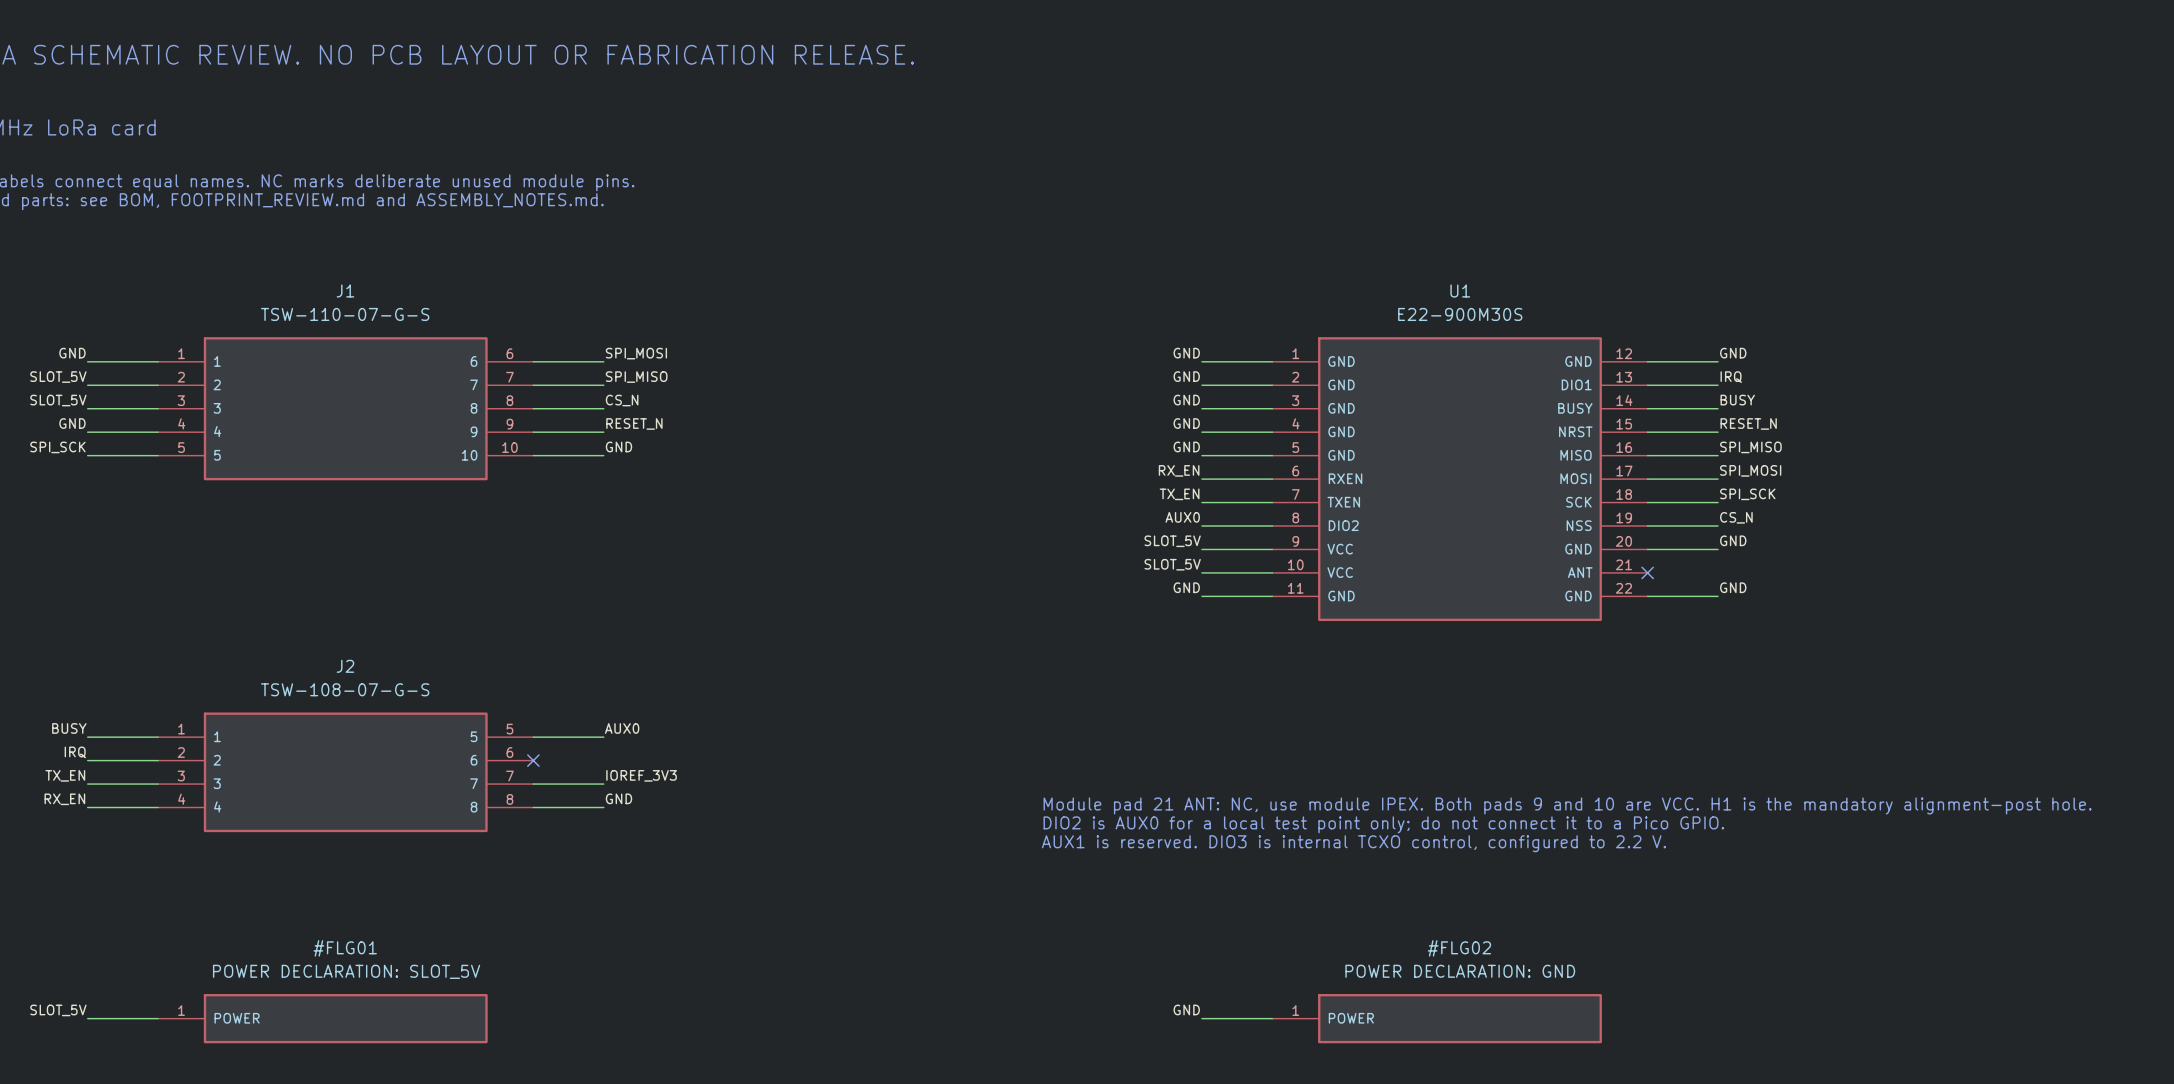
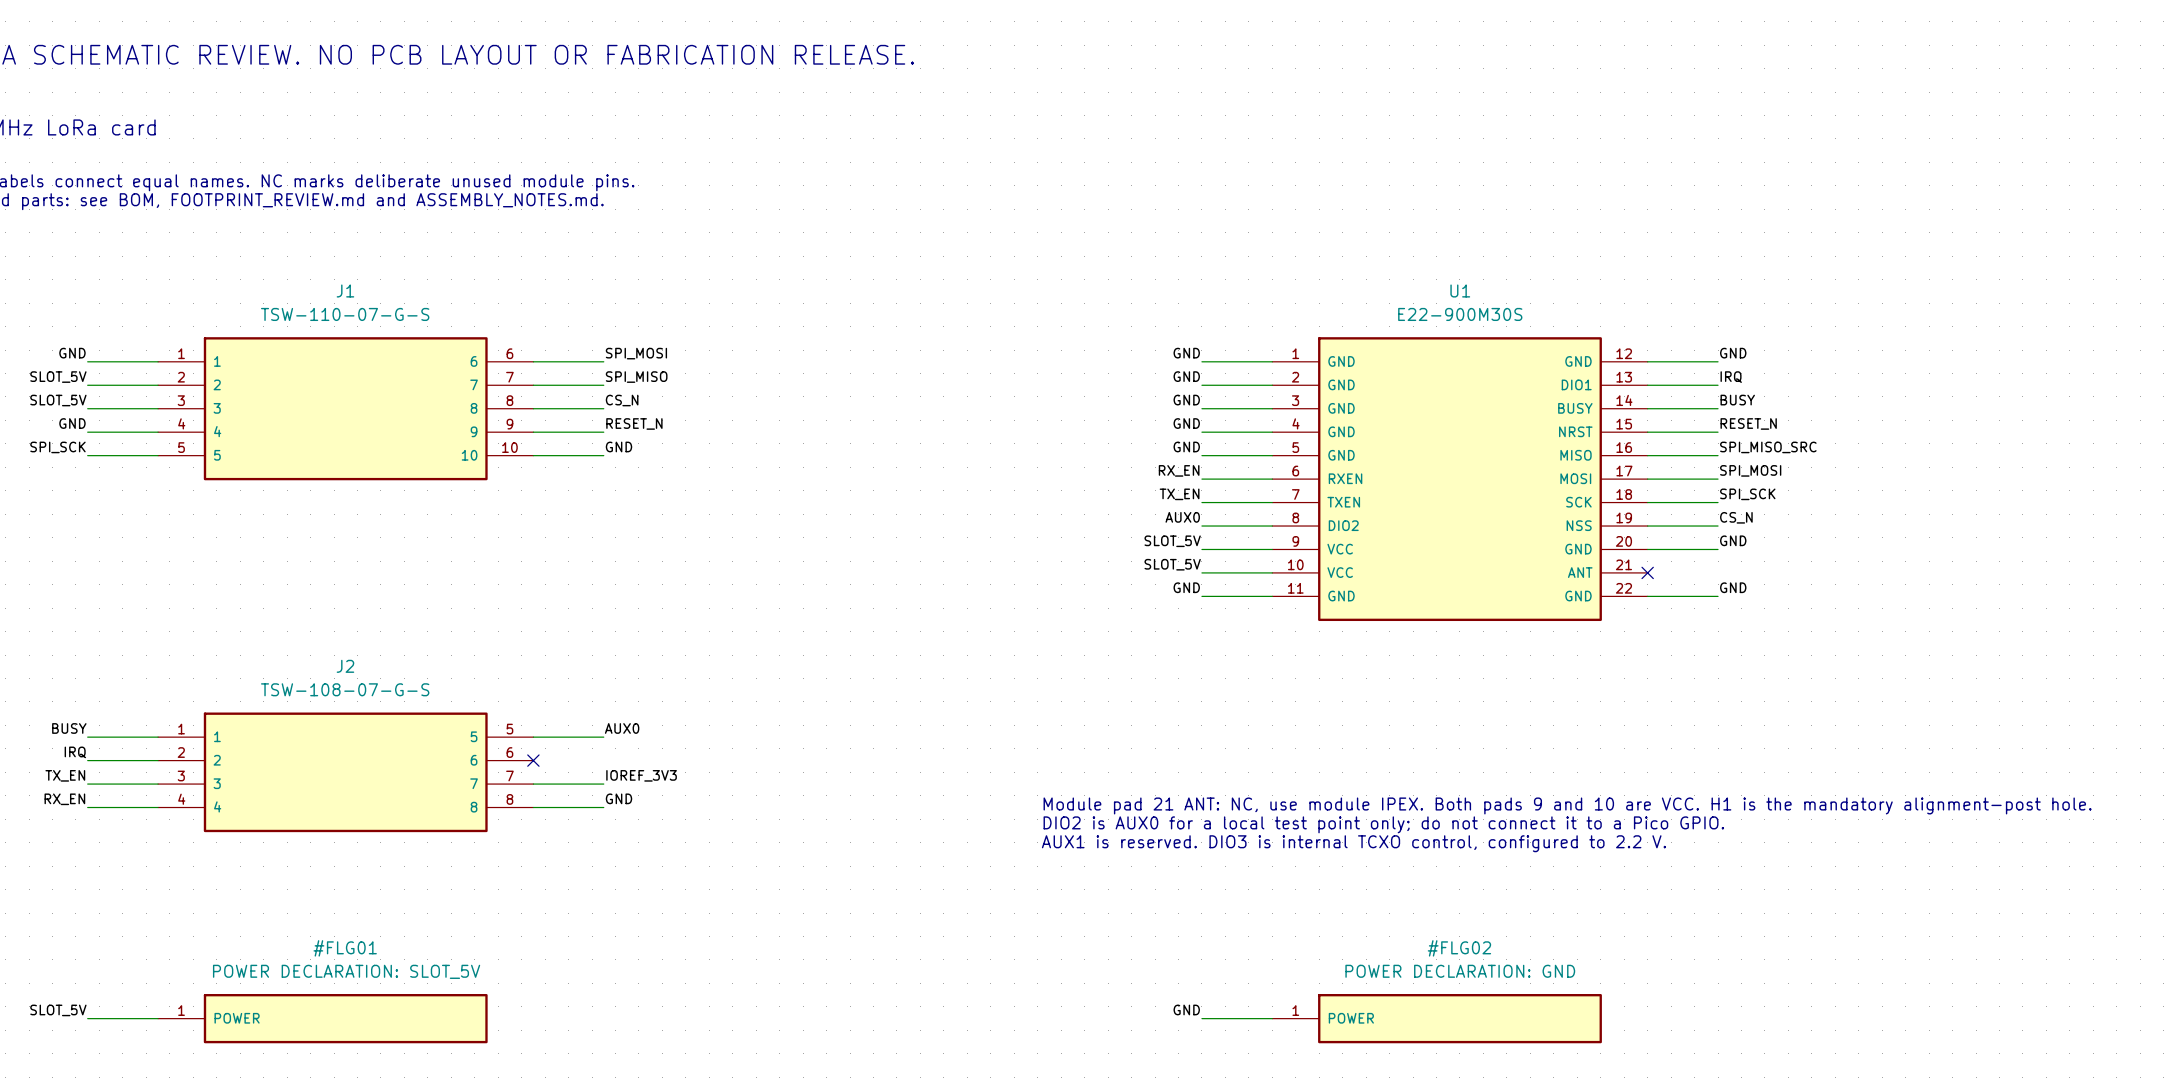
label: SPI_MISO (1750, 447) -> SPI_MISO_SRC (1768, 447)

